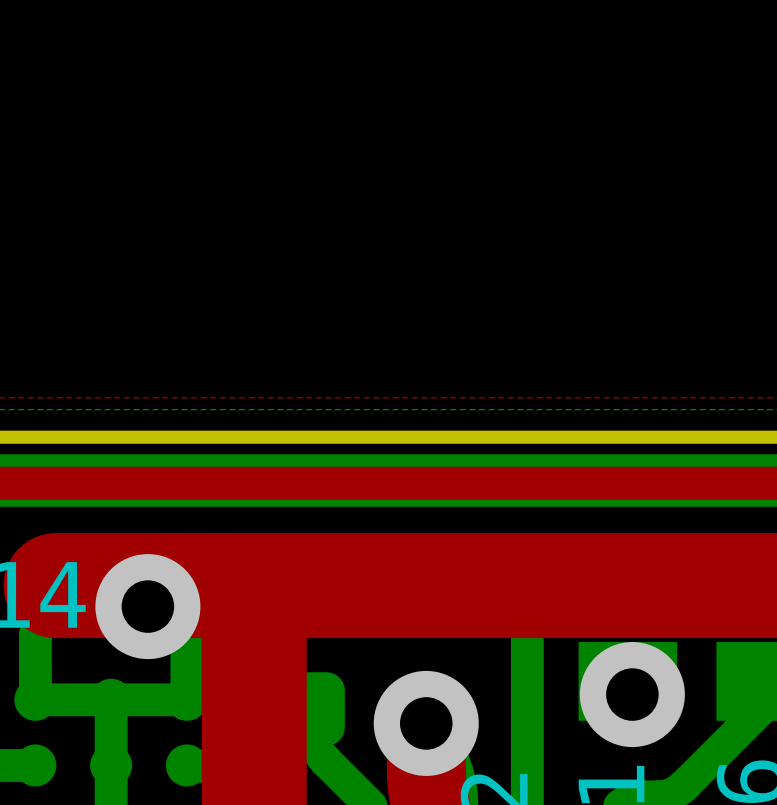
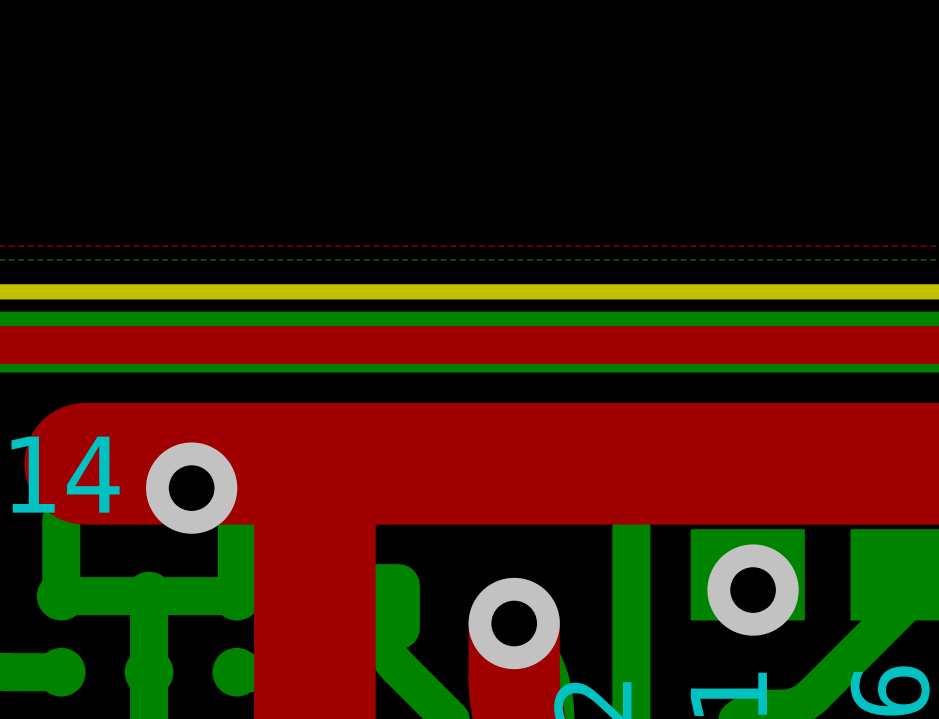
via size: [95, 554, 201, 660] -> [146, 442, 238, 534]
via size: [579, 642, 685, 748] -> [707, 544, 799, 636]
via size: [373, 670, 479, 776] -> [468, 577, 560, 670]

